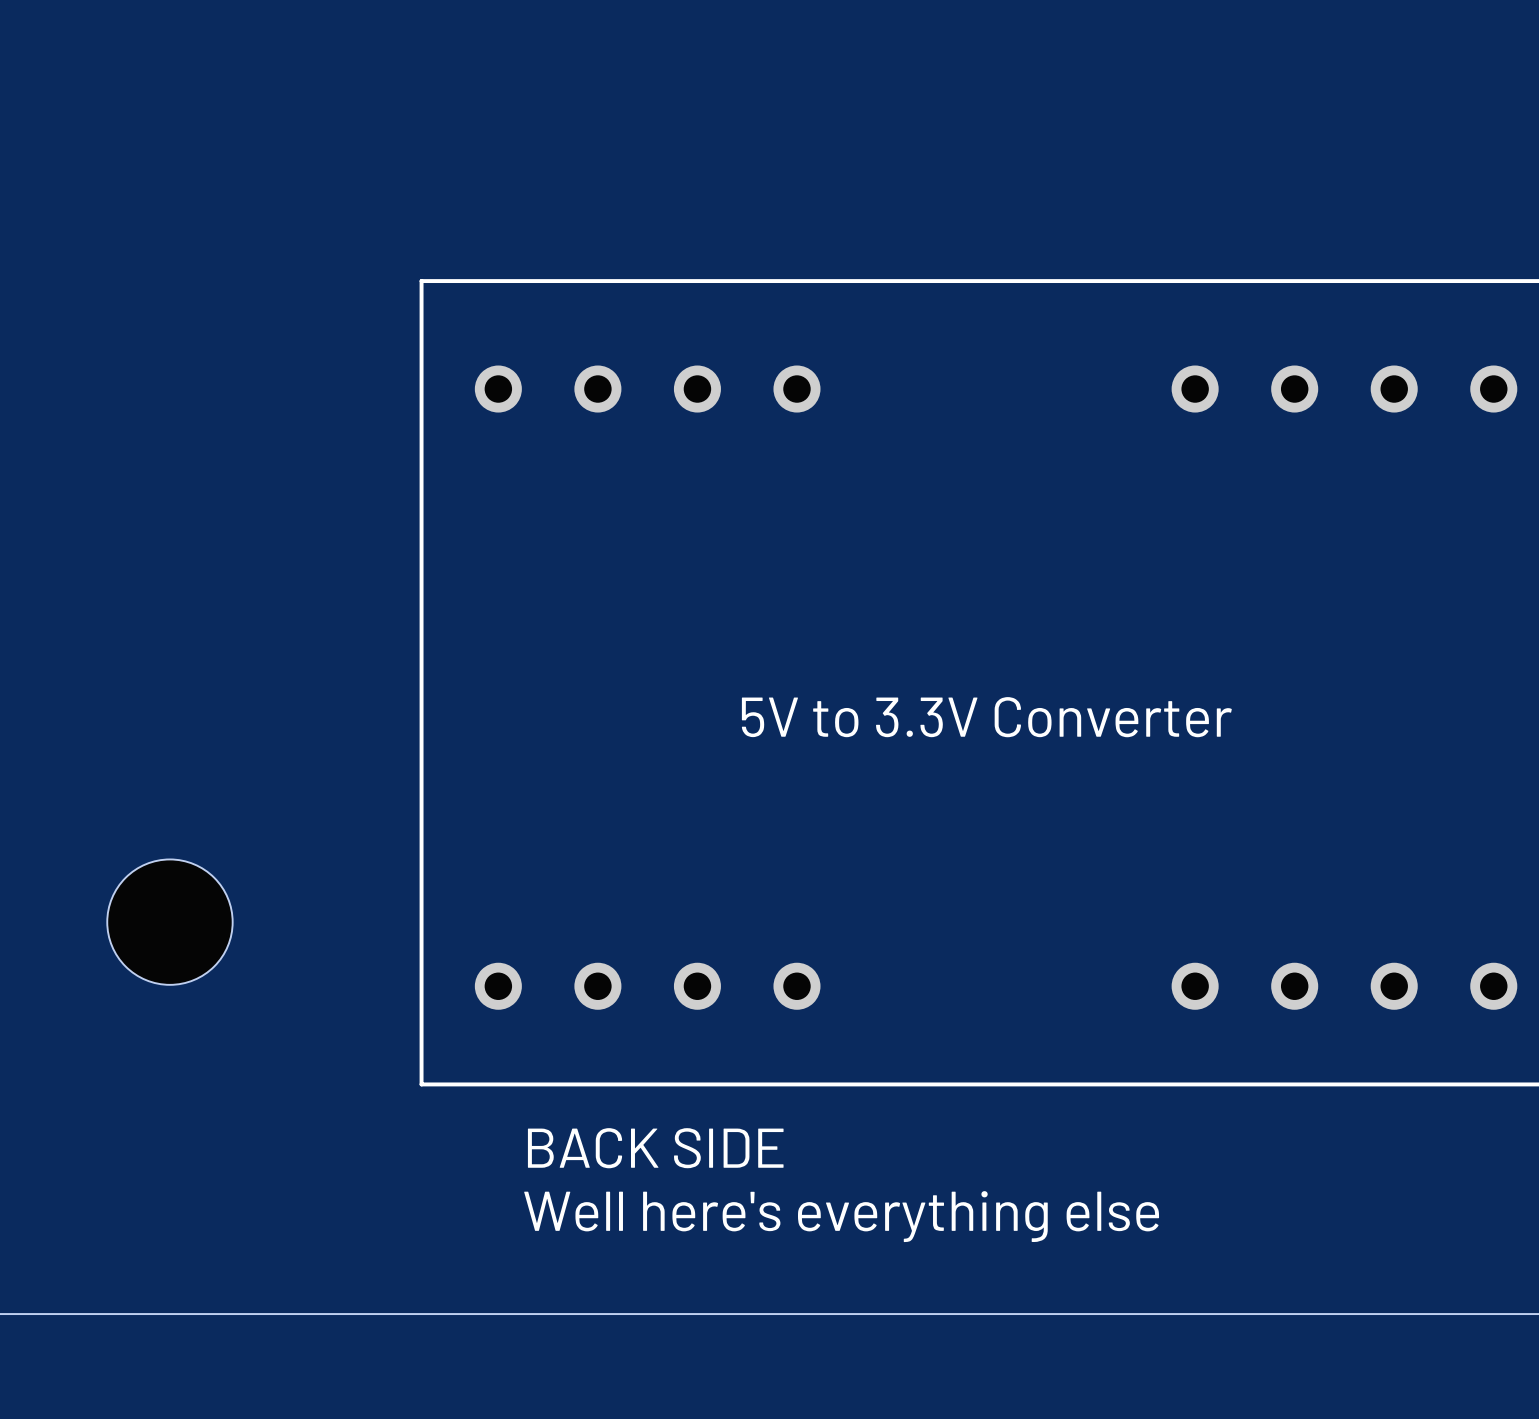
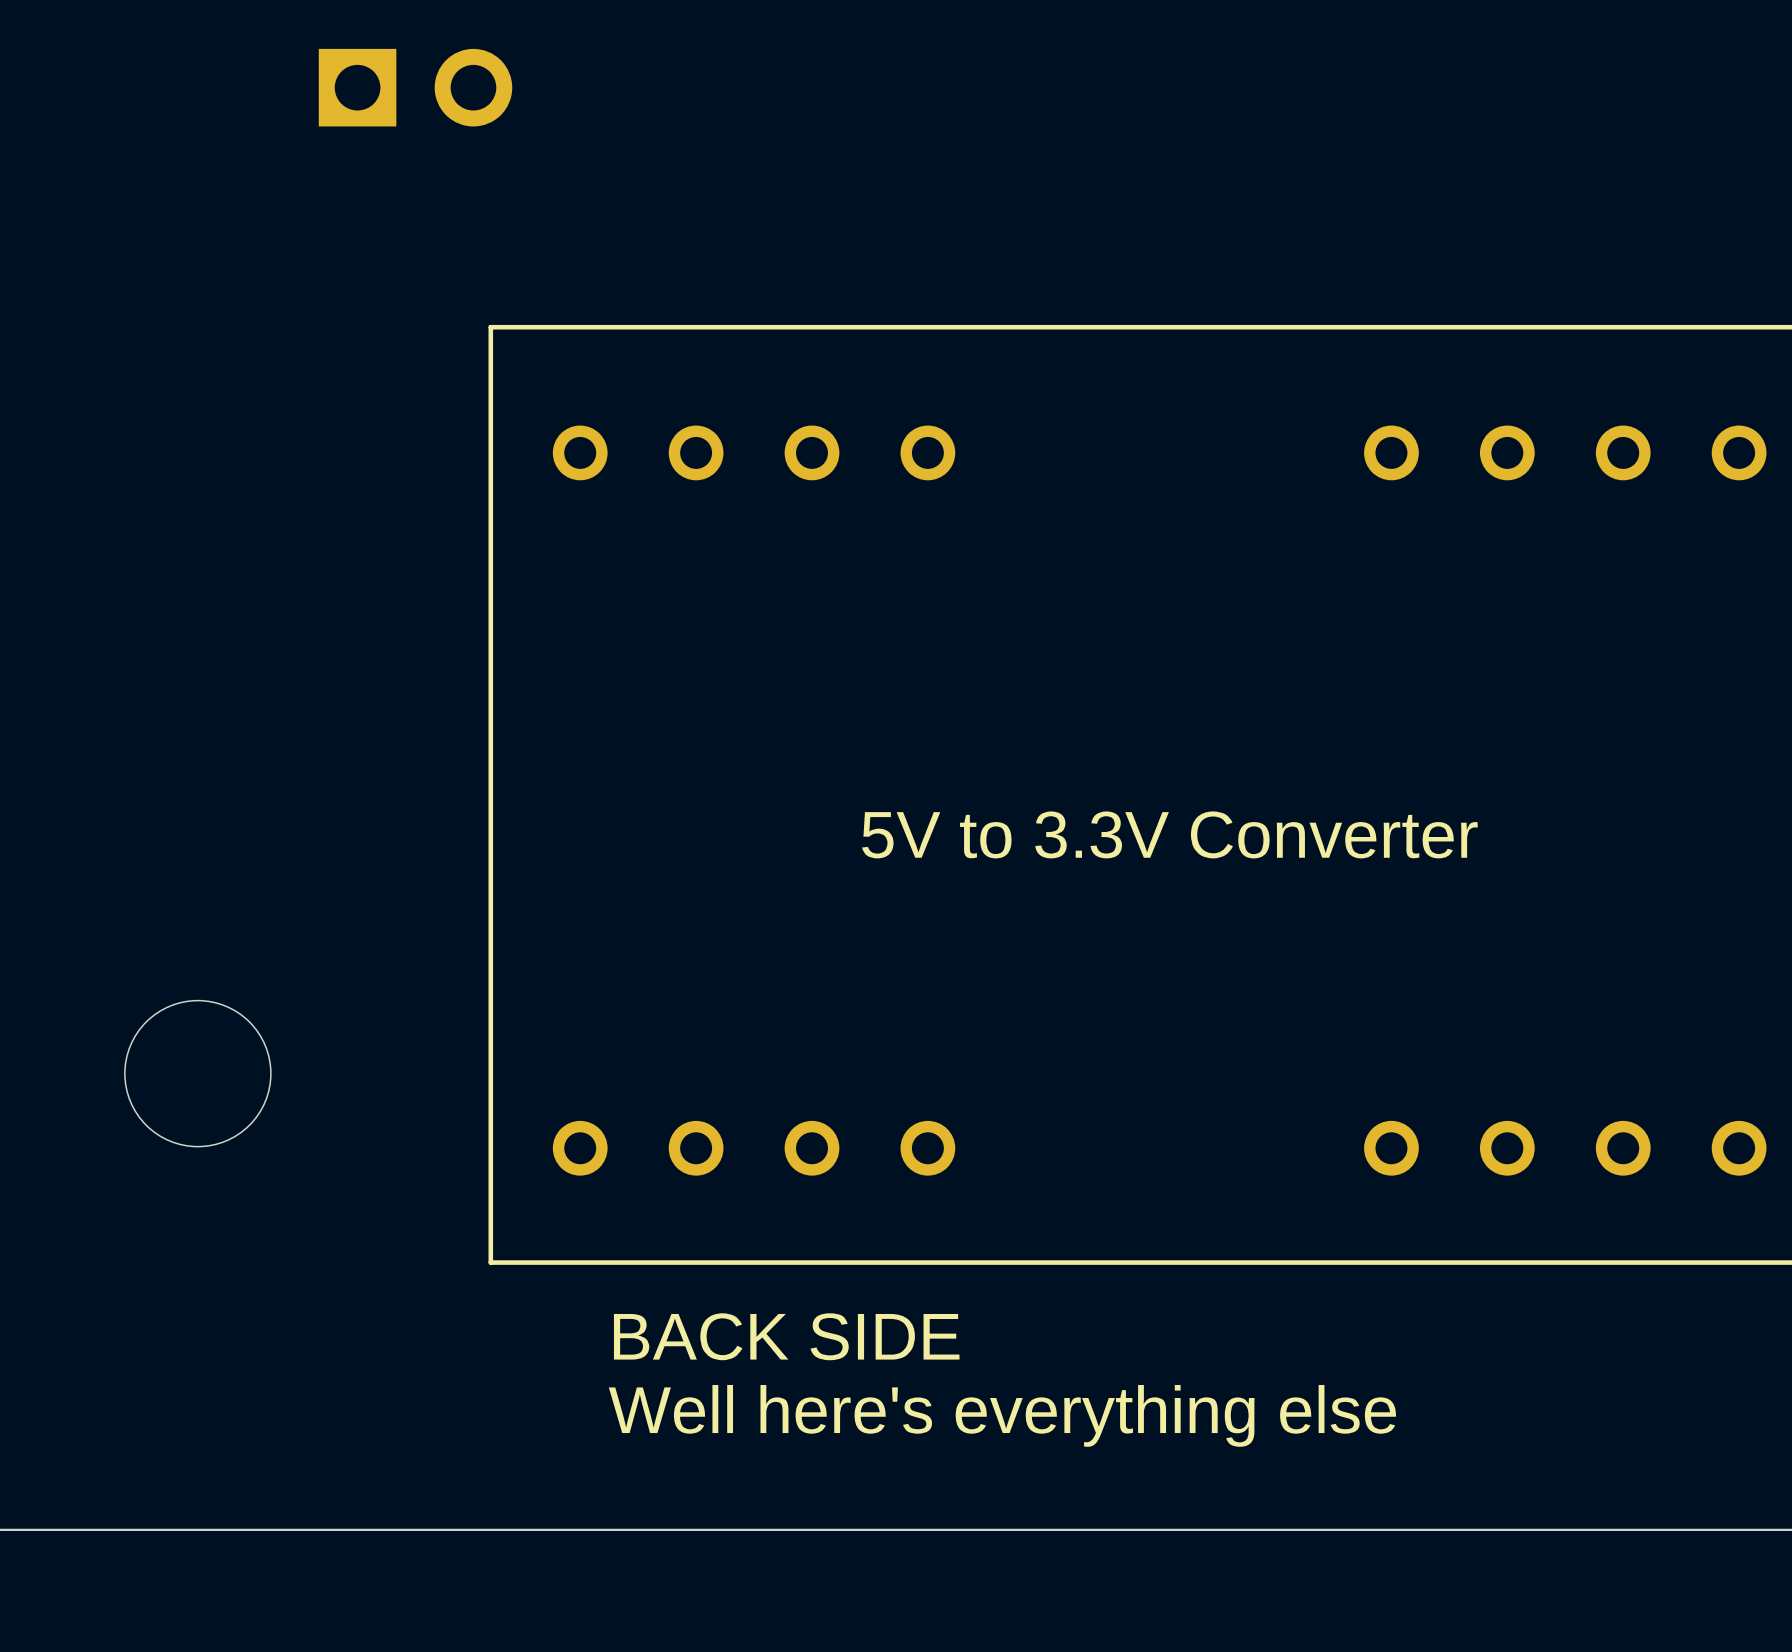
part: none -> (415, 87)

